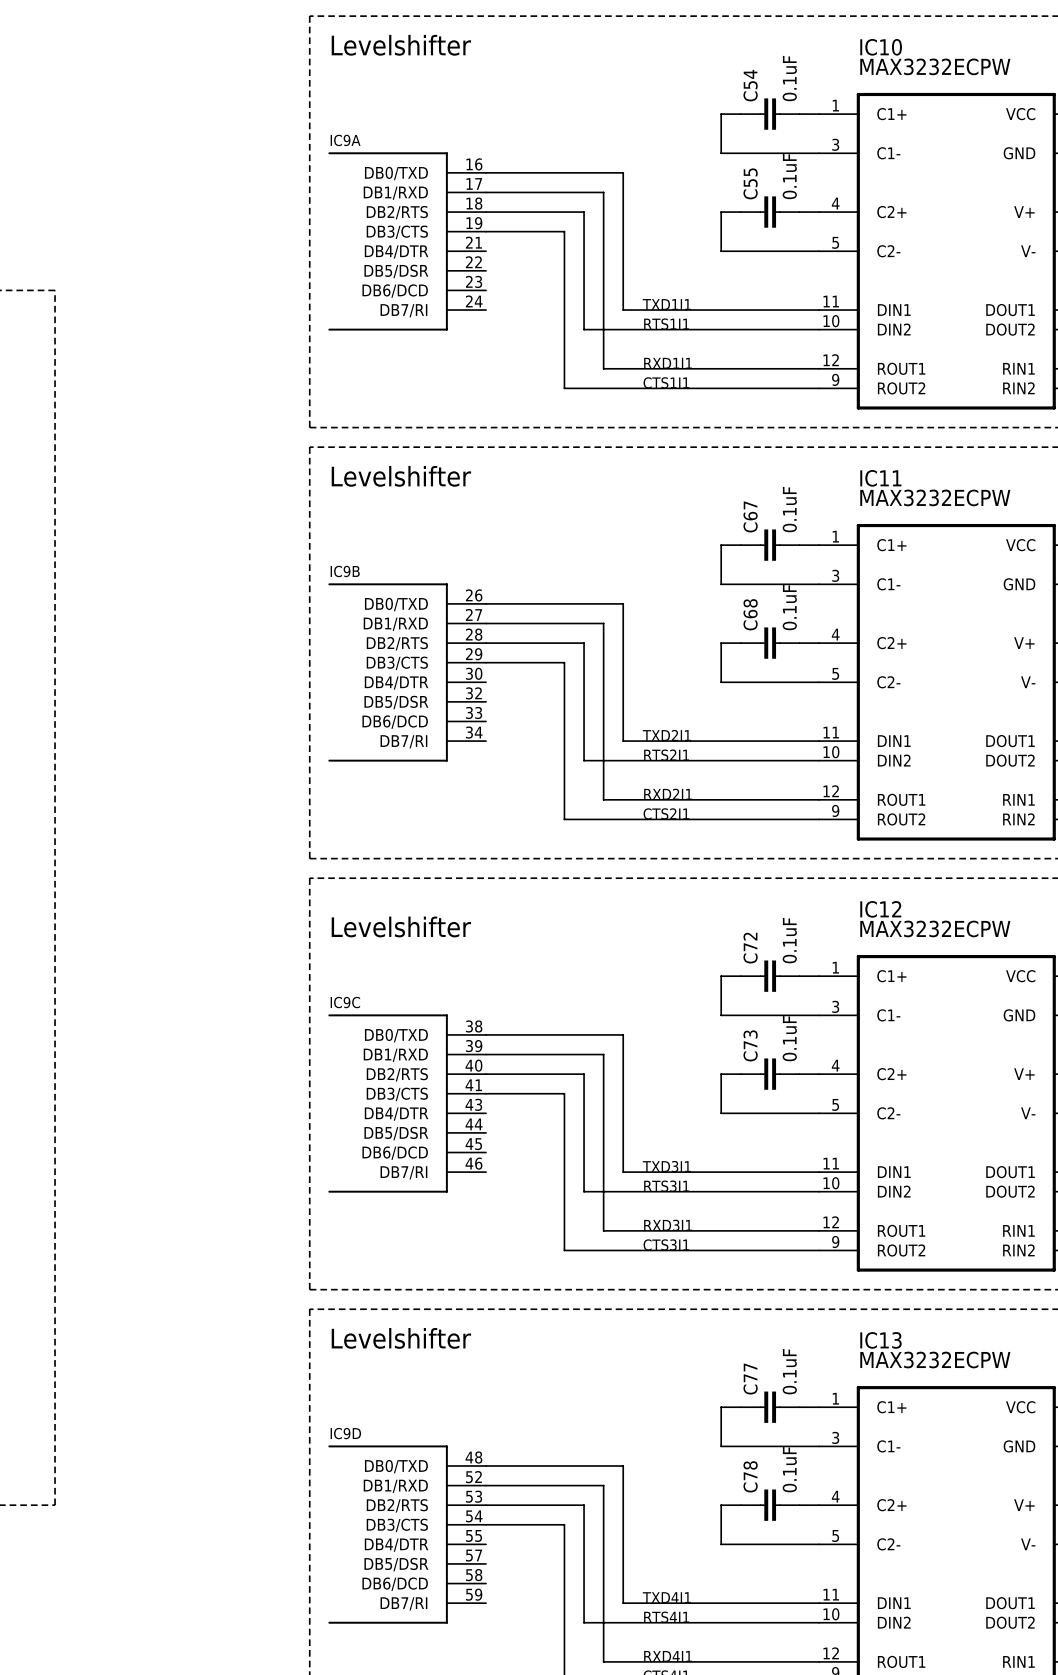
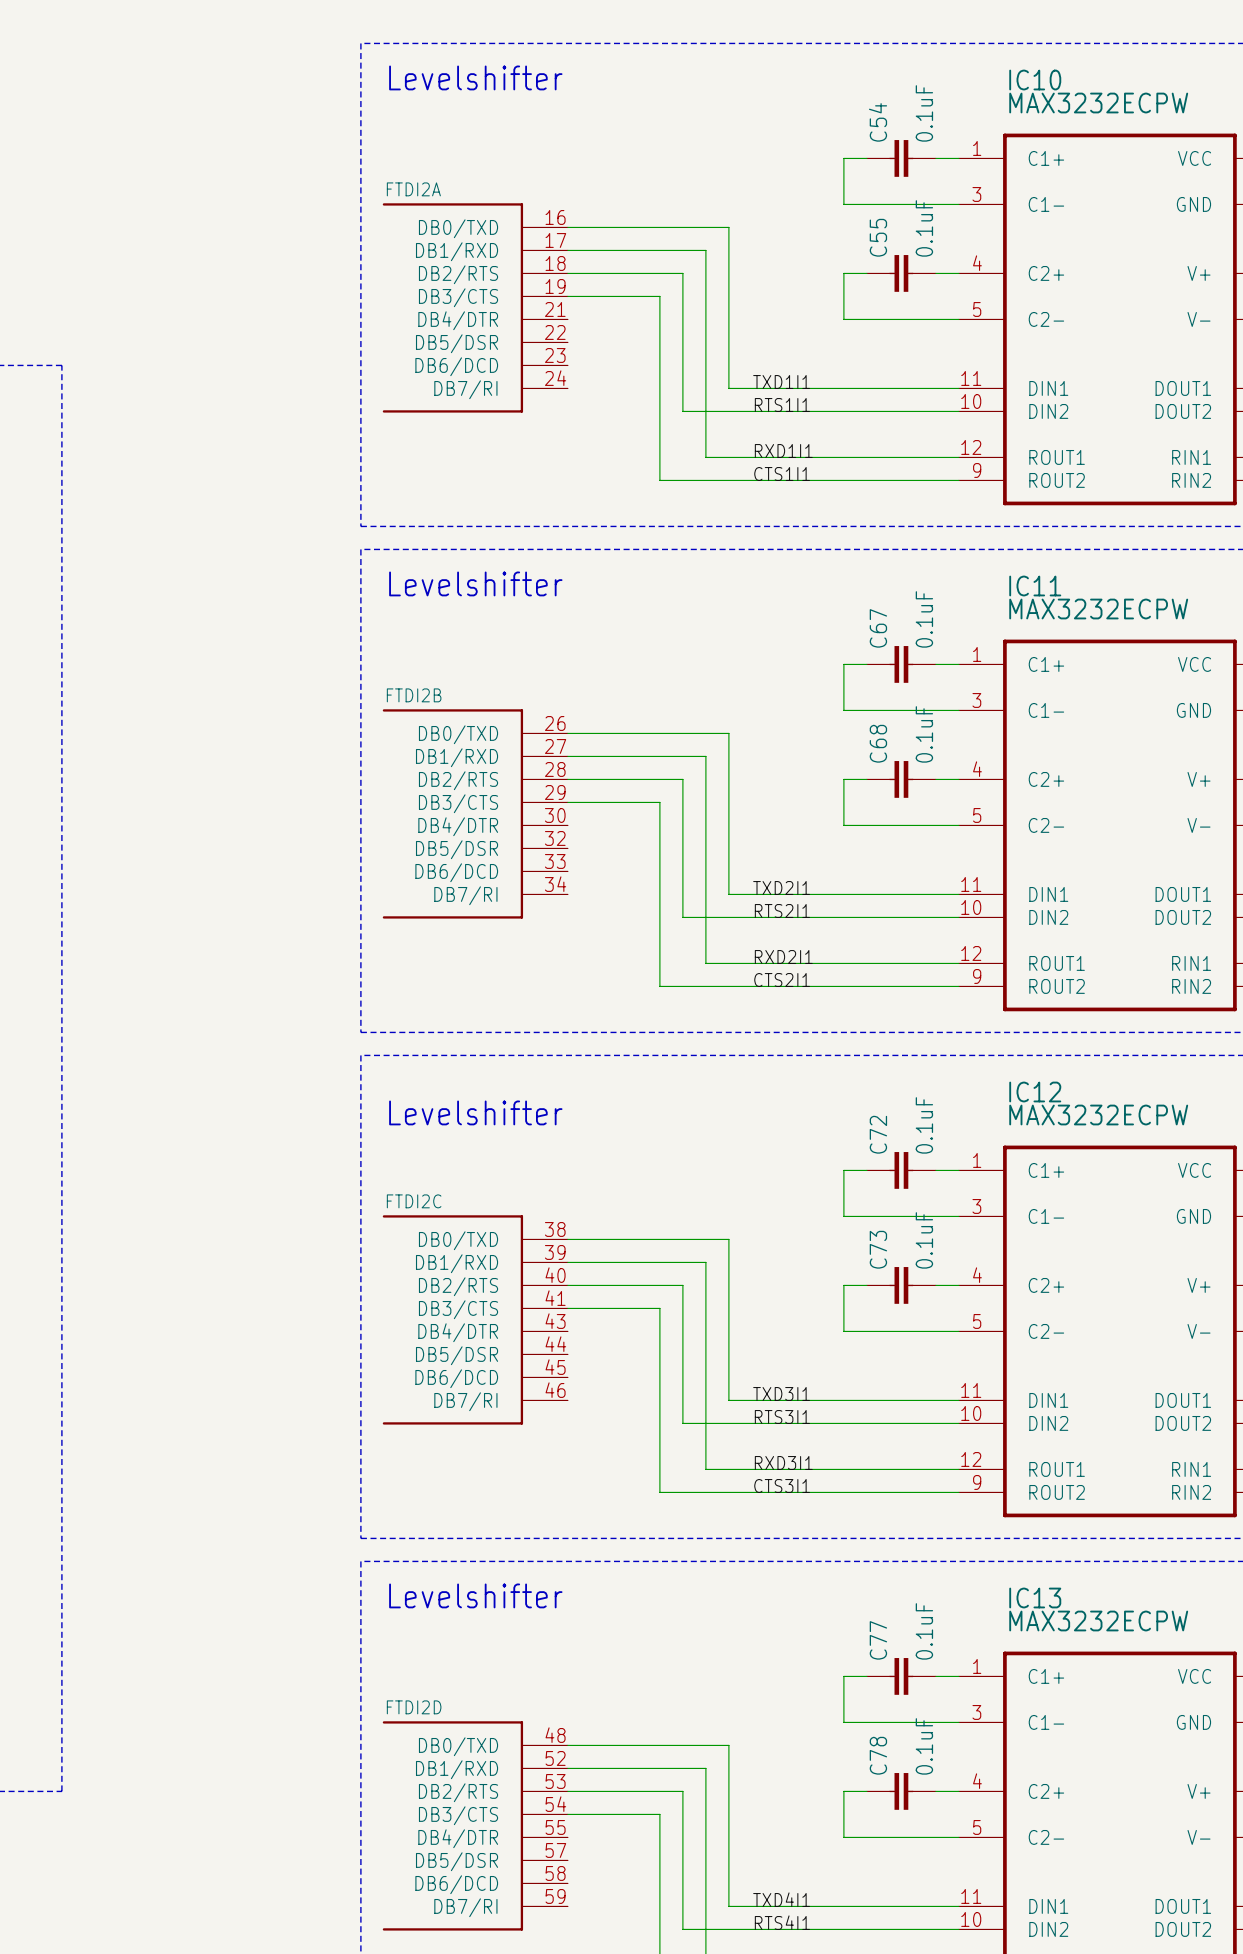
IC9A name: IC9A (345, 140) -> FTDI2A (413, 189)
IC9B name: IC9B (345, 571) -> FTDI2B (414, 695)
IC9C name: IC9C (345, 1002) -> FTDI2C (414, 1201)
IC9D name: IC9D (345, 1433) -> FTDI2D (414, 1707)

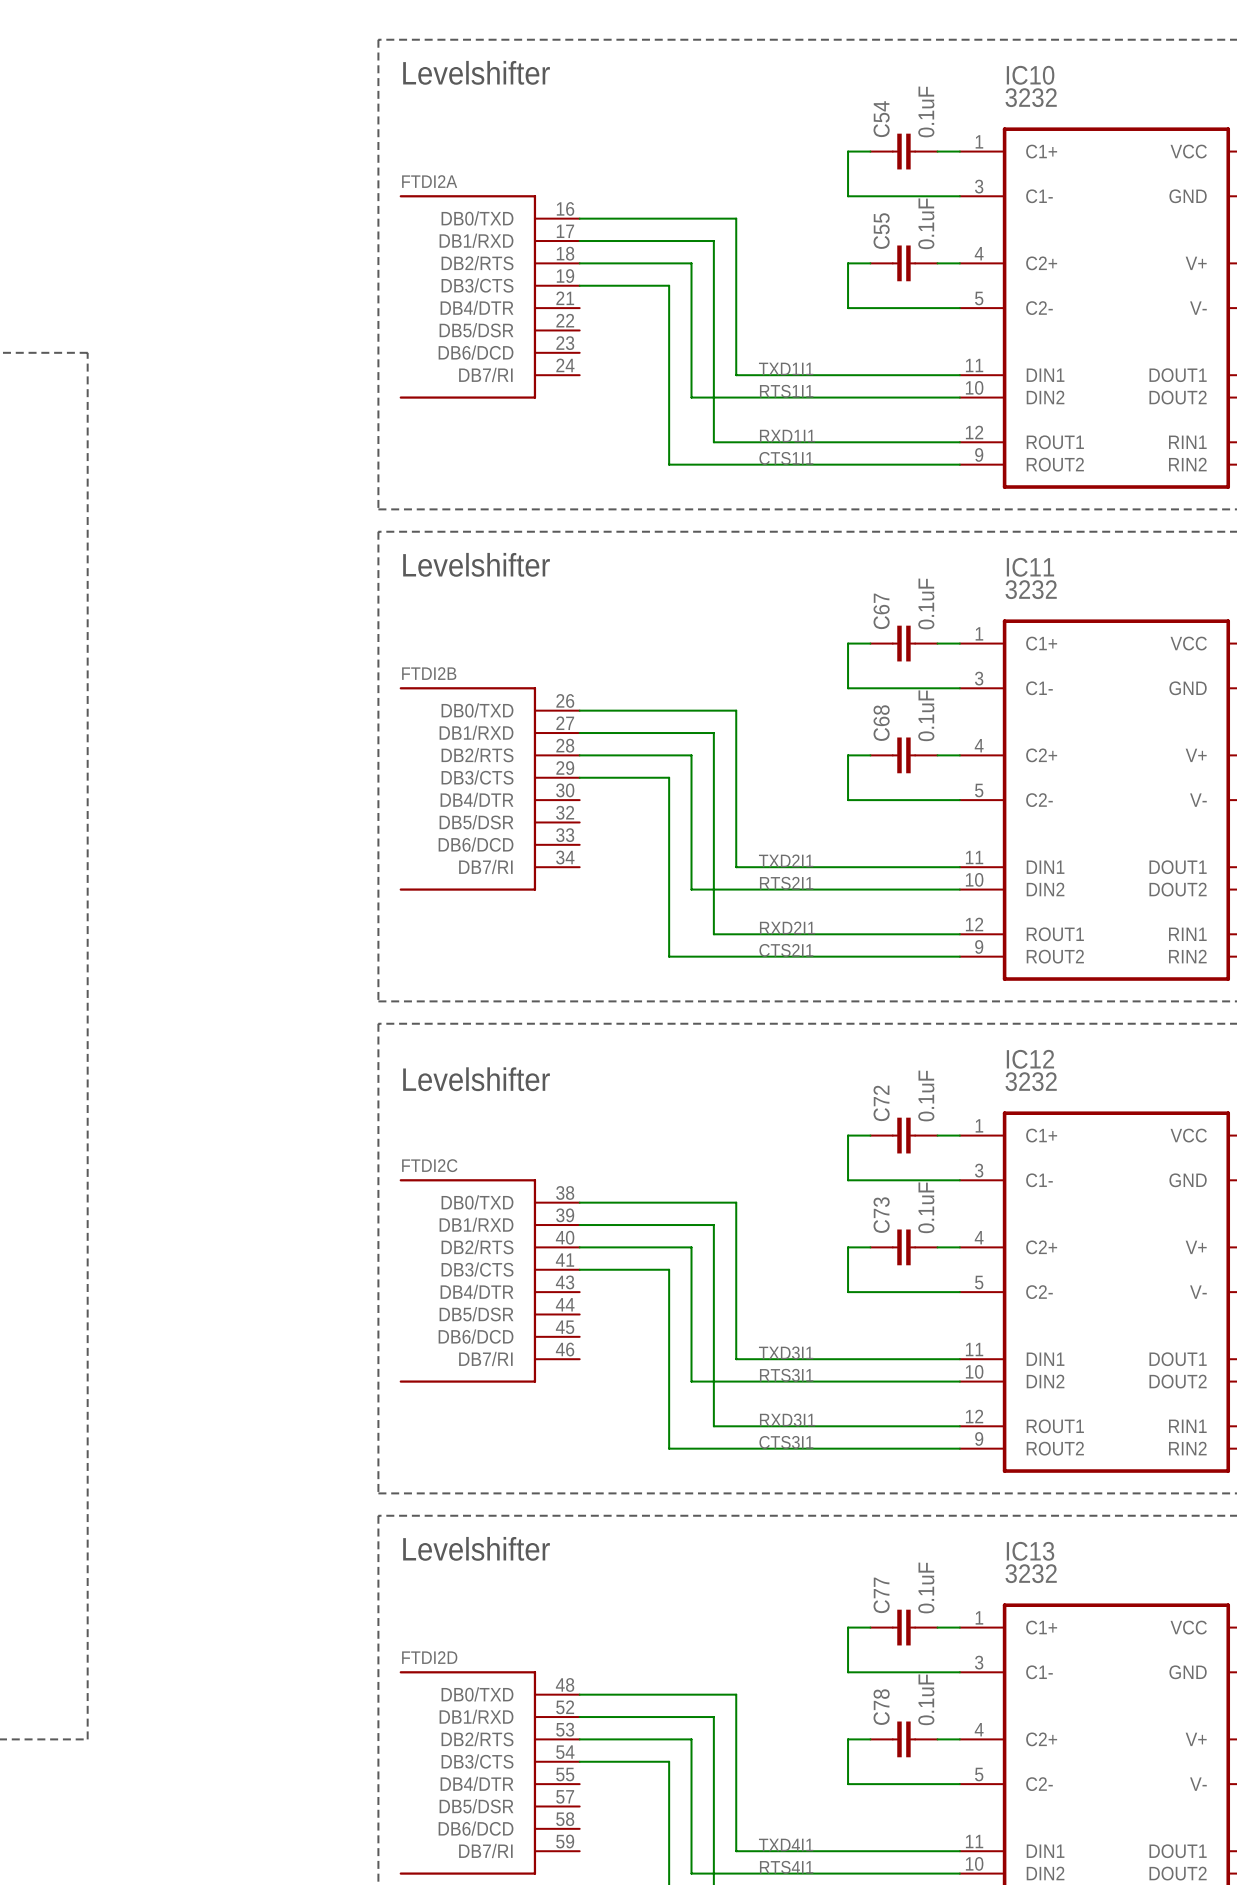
IC10 value: MAX3232ECPW (1098, 103) -> 3232 (1031, 97)
IC11 value: MAX3232ECPW (1098, 609) -> 3232 (1031, 589)
IC12 value: MAX3232ECPW (1098, 1115) -> 3232 (1031, 1081)
IC13 value: MAX3232ECPW (1098, 1621) -> 3232 (1031, 1573)

